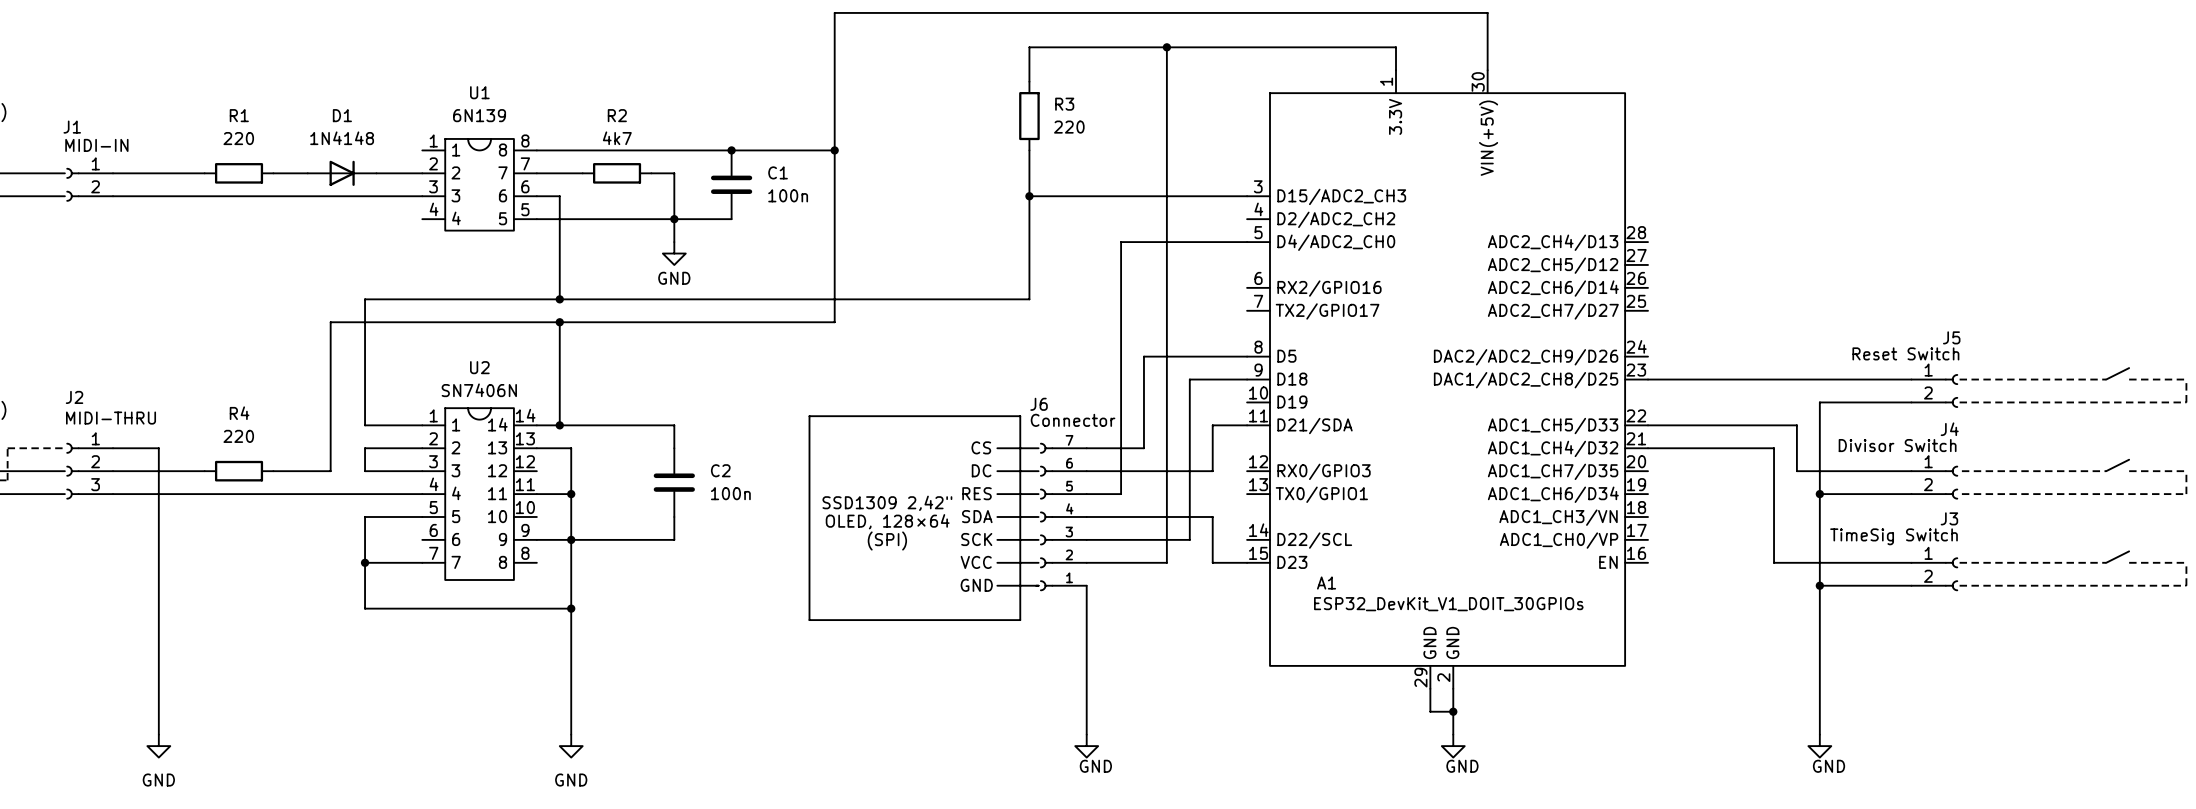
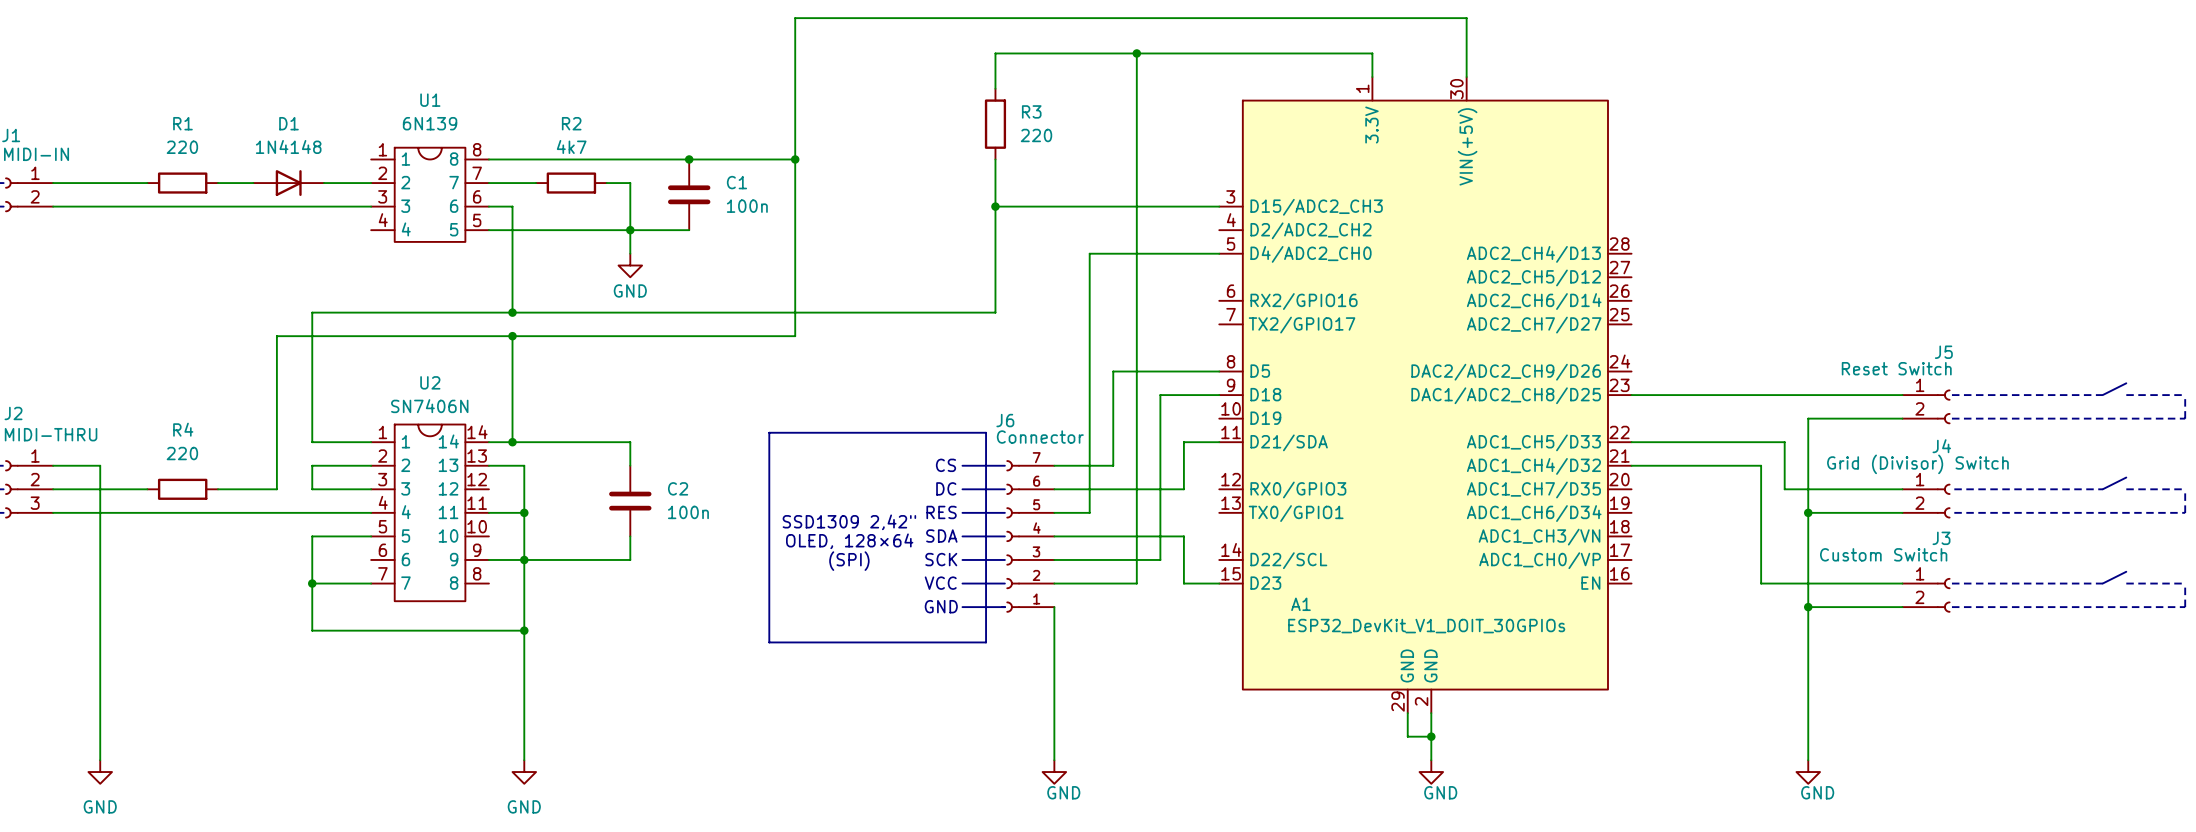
J4 value: Divisor Switch (1897, 445) -> Grid (Divisor) Switch (1917, 464)
J3 value: TimeSig Switch (1894, 536) -> Custom Switch (1883, 554)

